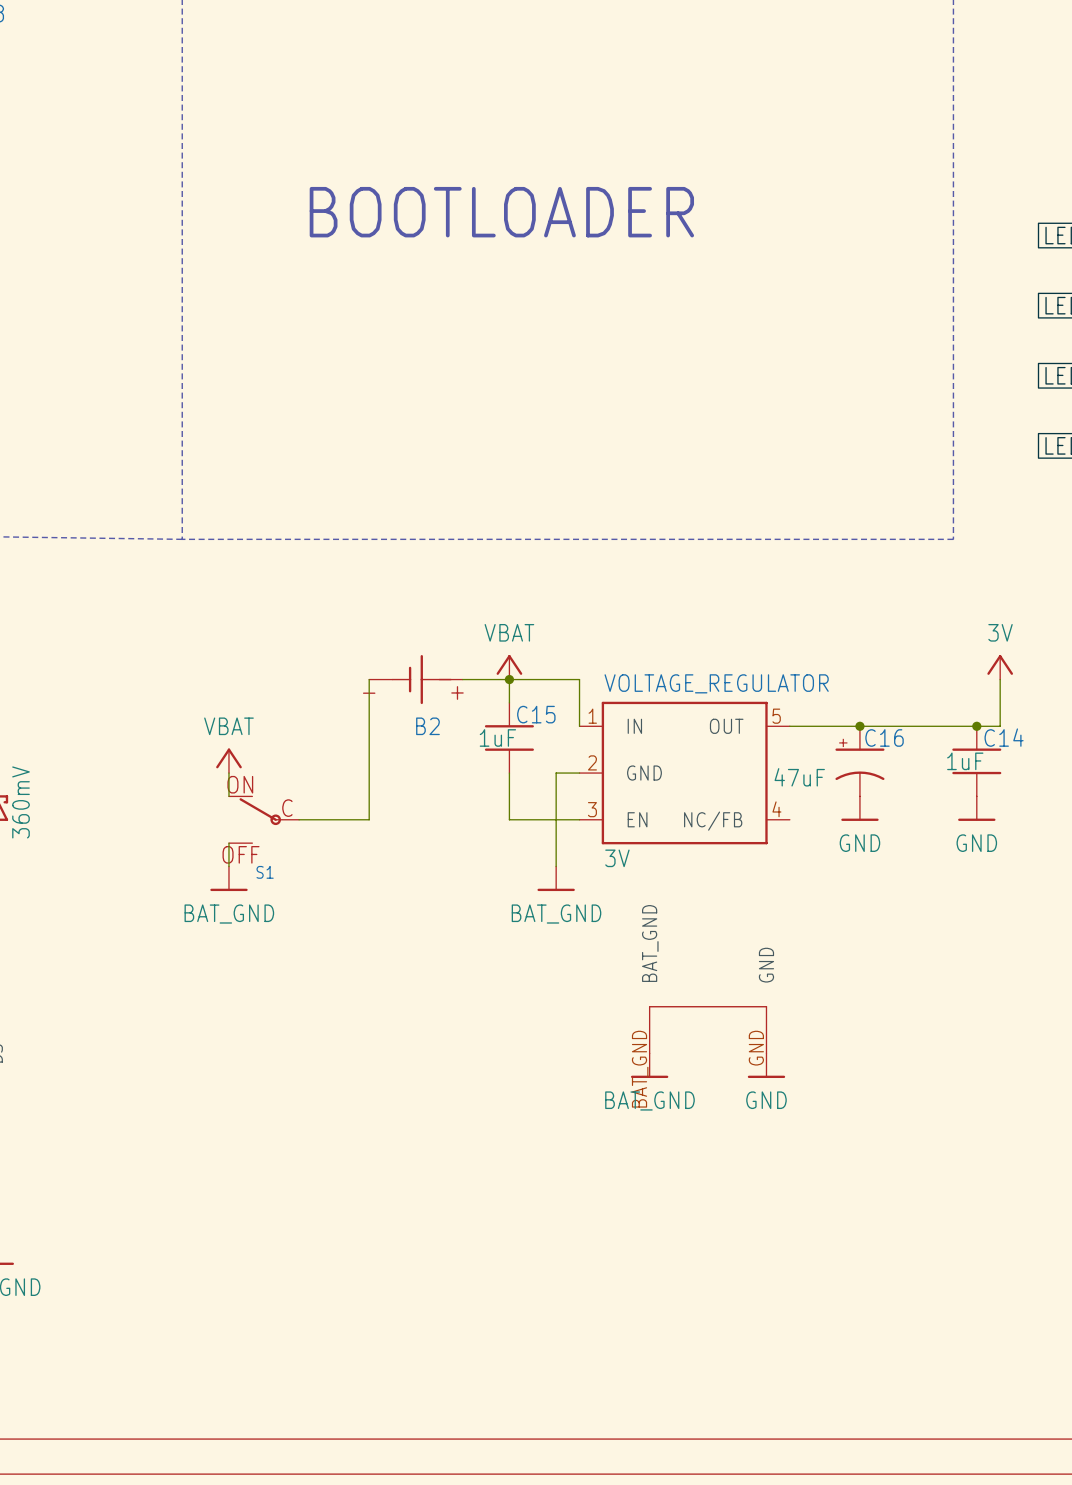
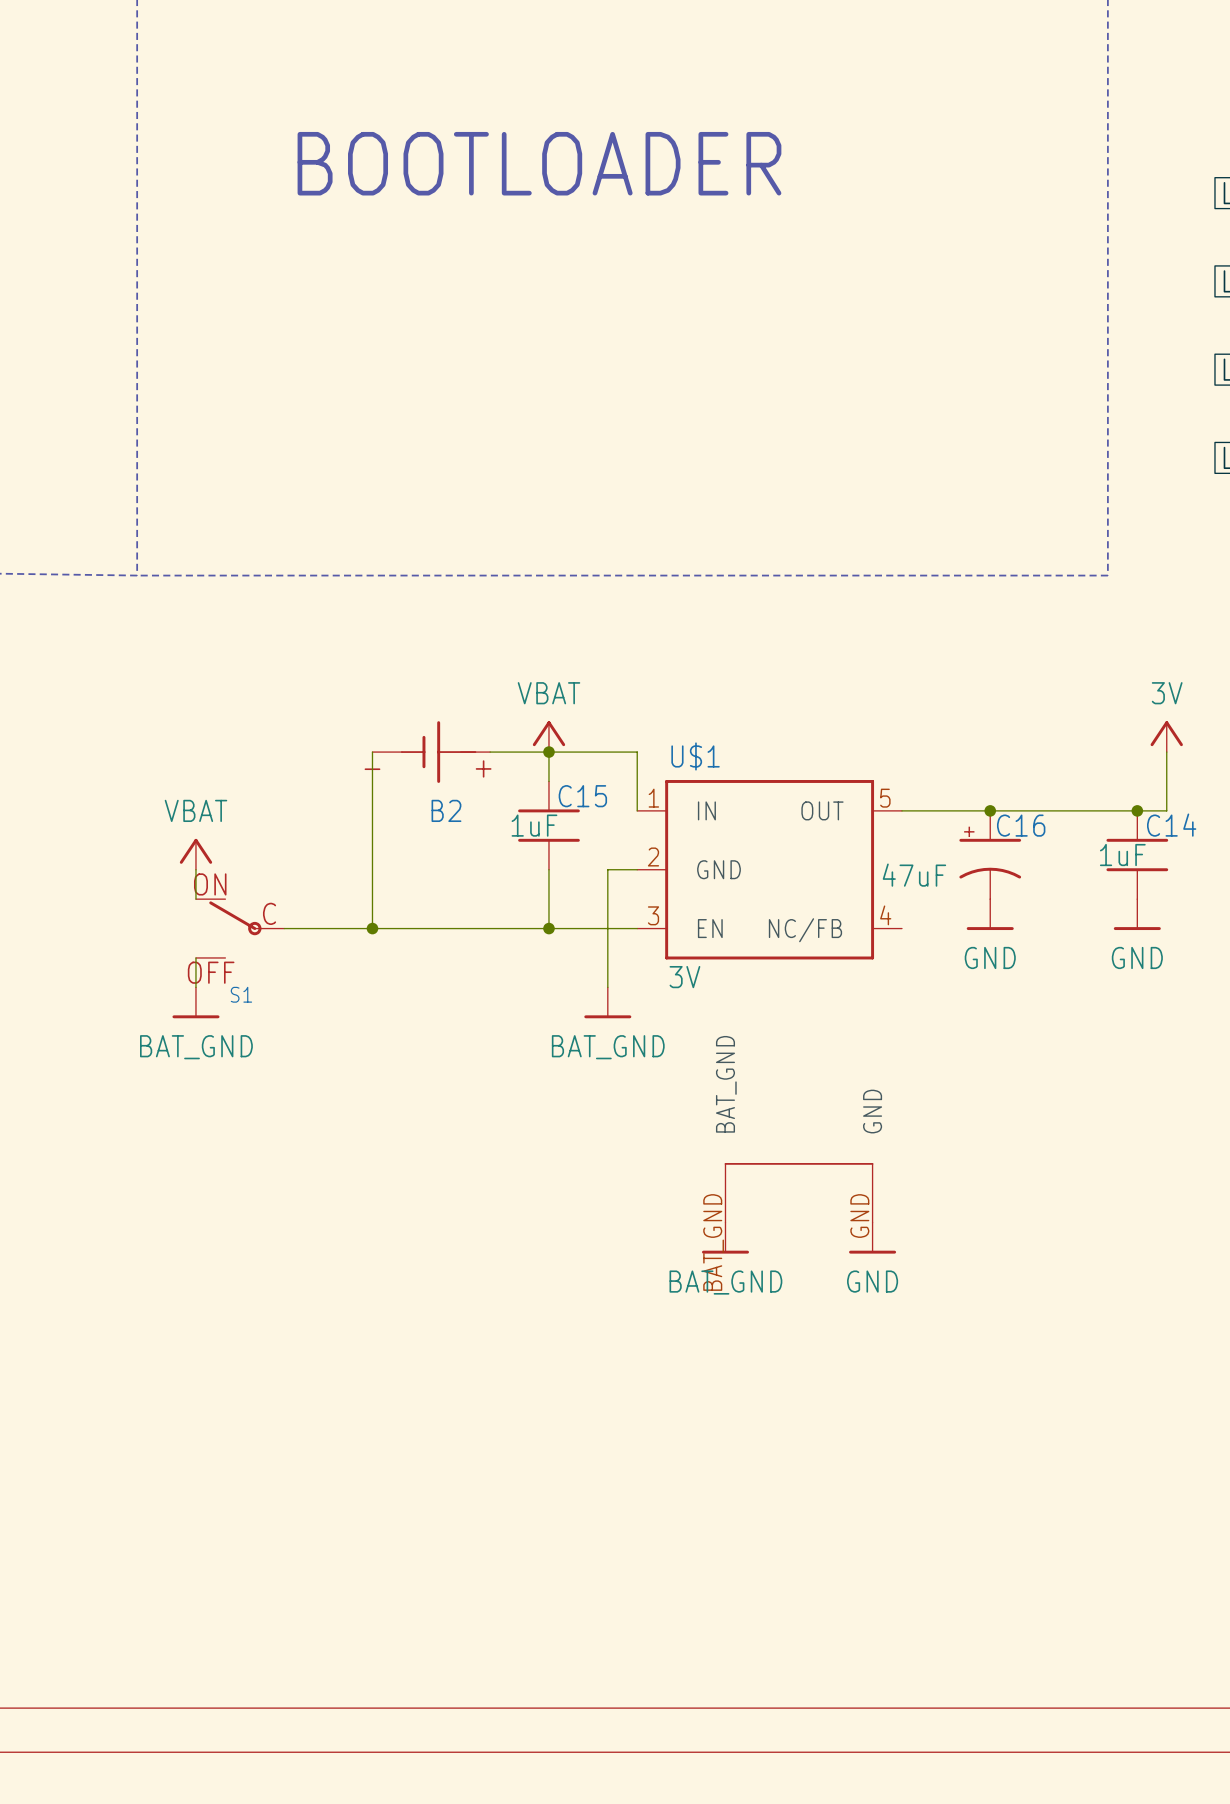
VOLTAGE_REGULATOR name: VOLTAGE_REGULATOR (716, 683) -> U$1 (695, 756)
wire: none -> (372, 928) (548, 928)
junction: none -> (372, 928)
junction: none -> (548, 928)

